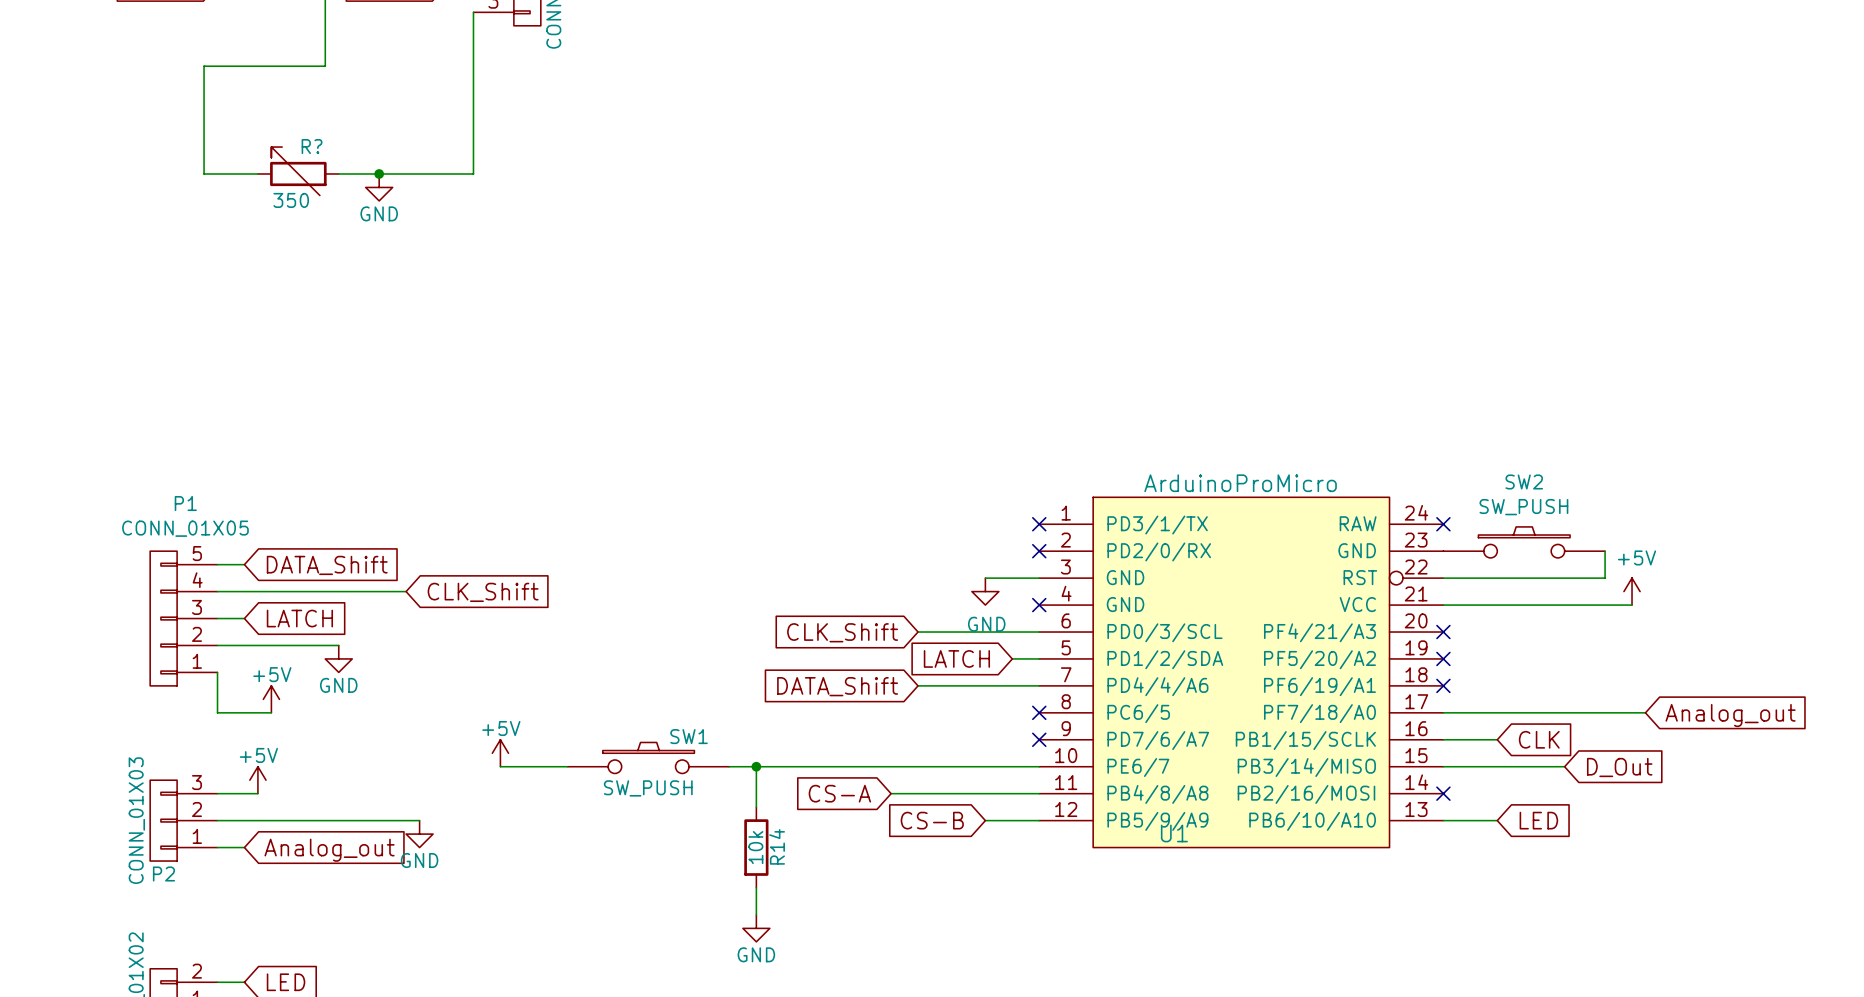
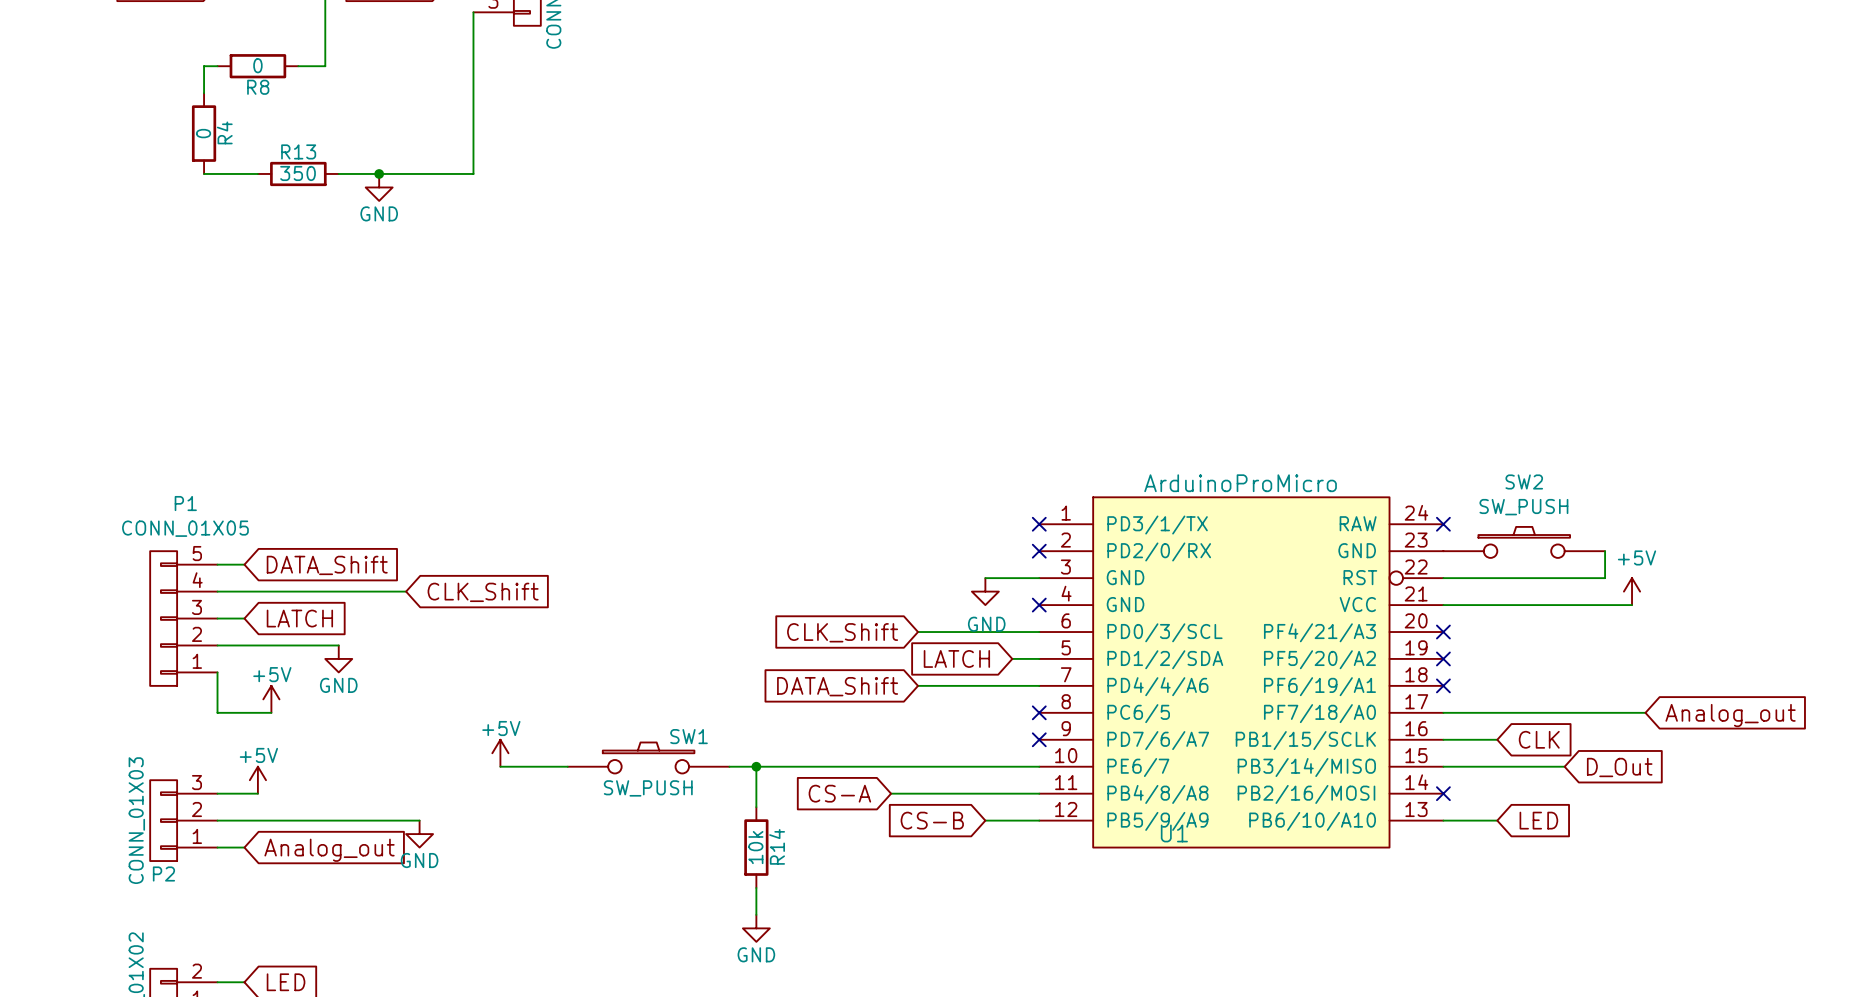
wire: (217, 66) (298, 66) -> none
R8: none -> 0 (257, 66)
wire: (204, 93) (204, 173) -> none
R4: none -> 0 (204, 133)
R?: 350 (298, 171) -> none
R13: none -> 350 (298, 173)

